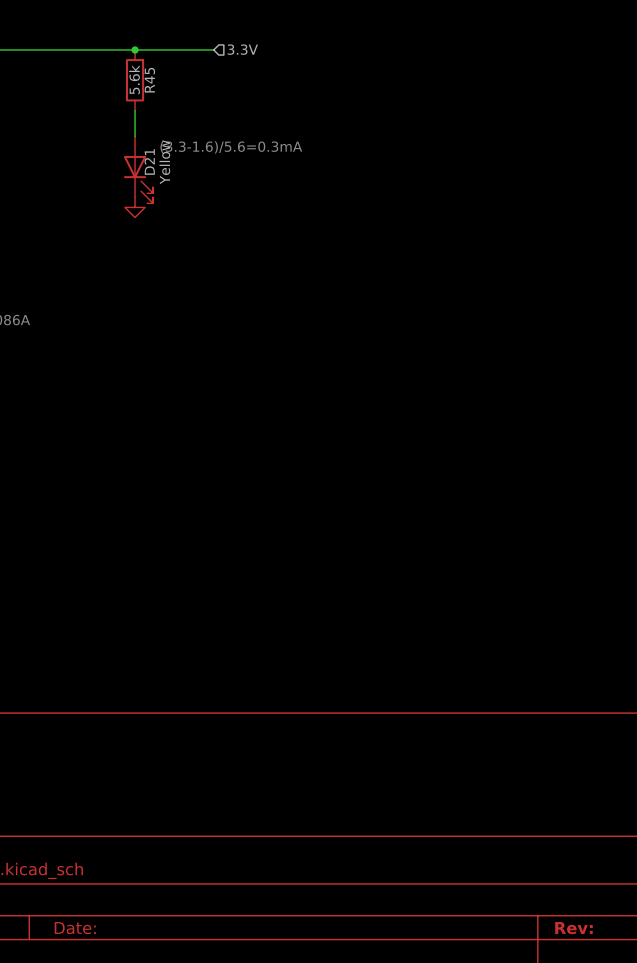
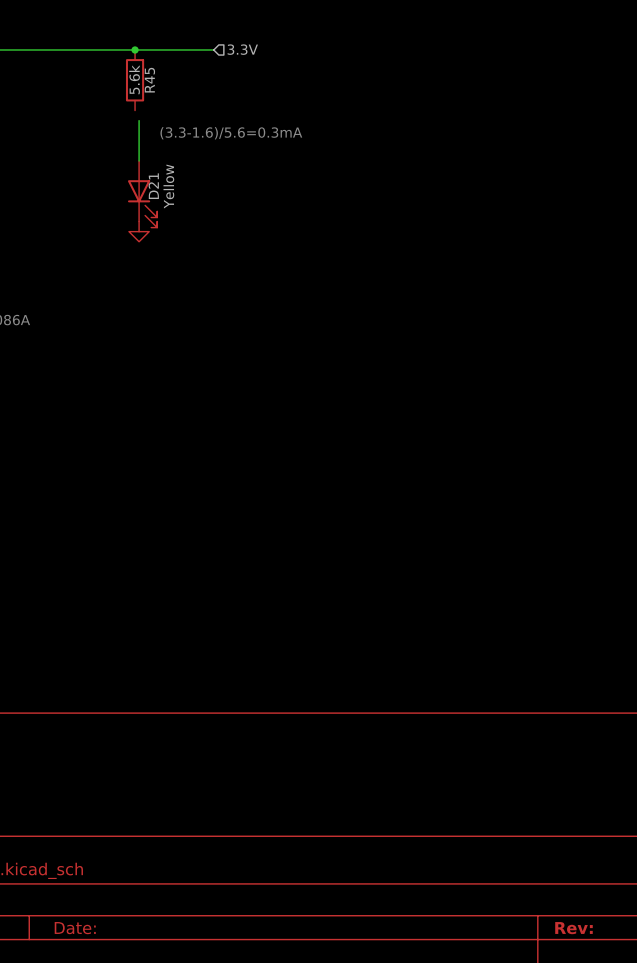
wire: (135, 110) (135, 136) -> none
wire: none -> (139, 120) (139, 161)
text position: (3.3-1.6)/5.6=0.3mA (231, 147) -> (3.3-1.6)/5.6=0.3mA (231, 133)
D21 position: (138, 170) -> (142, 194)
power symbol position: (135, 207) -> (139, 231)

